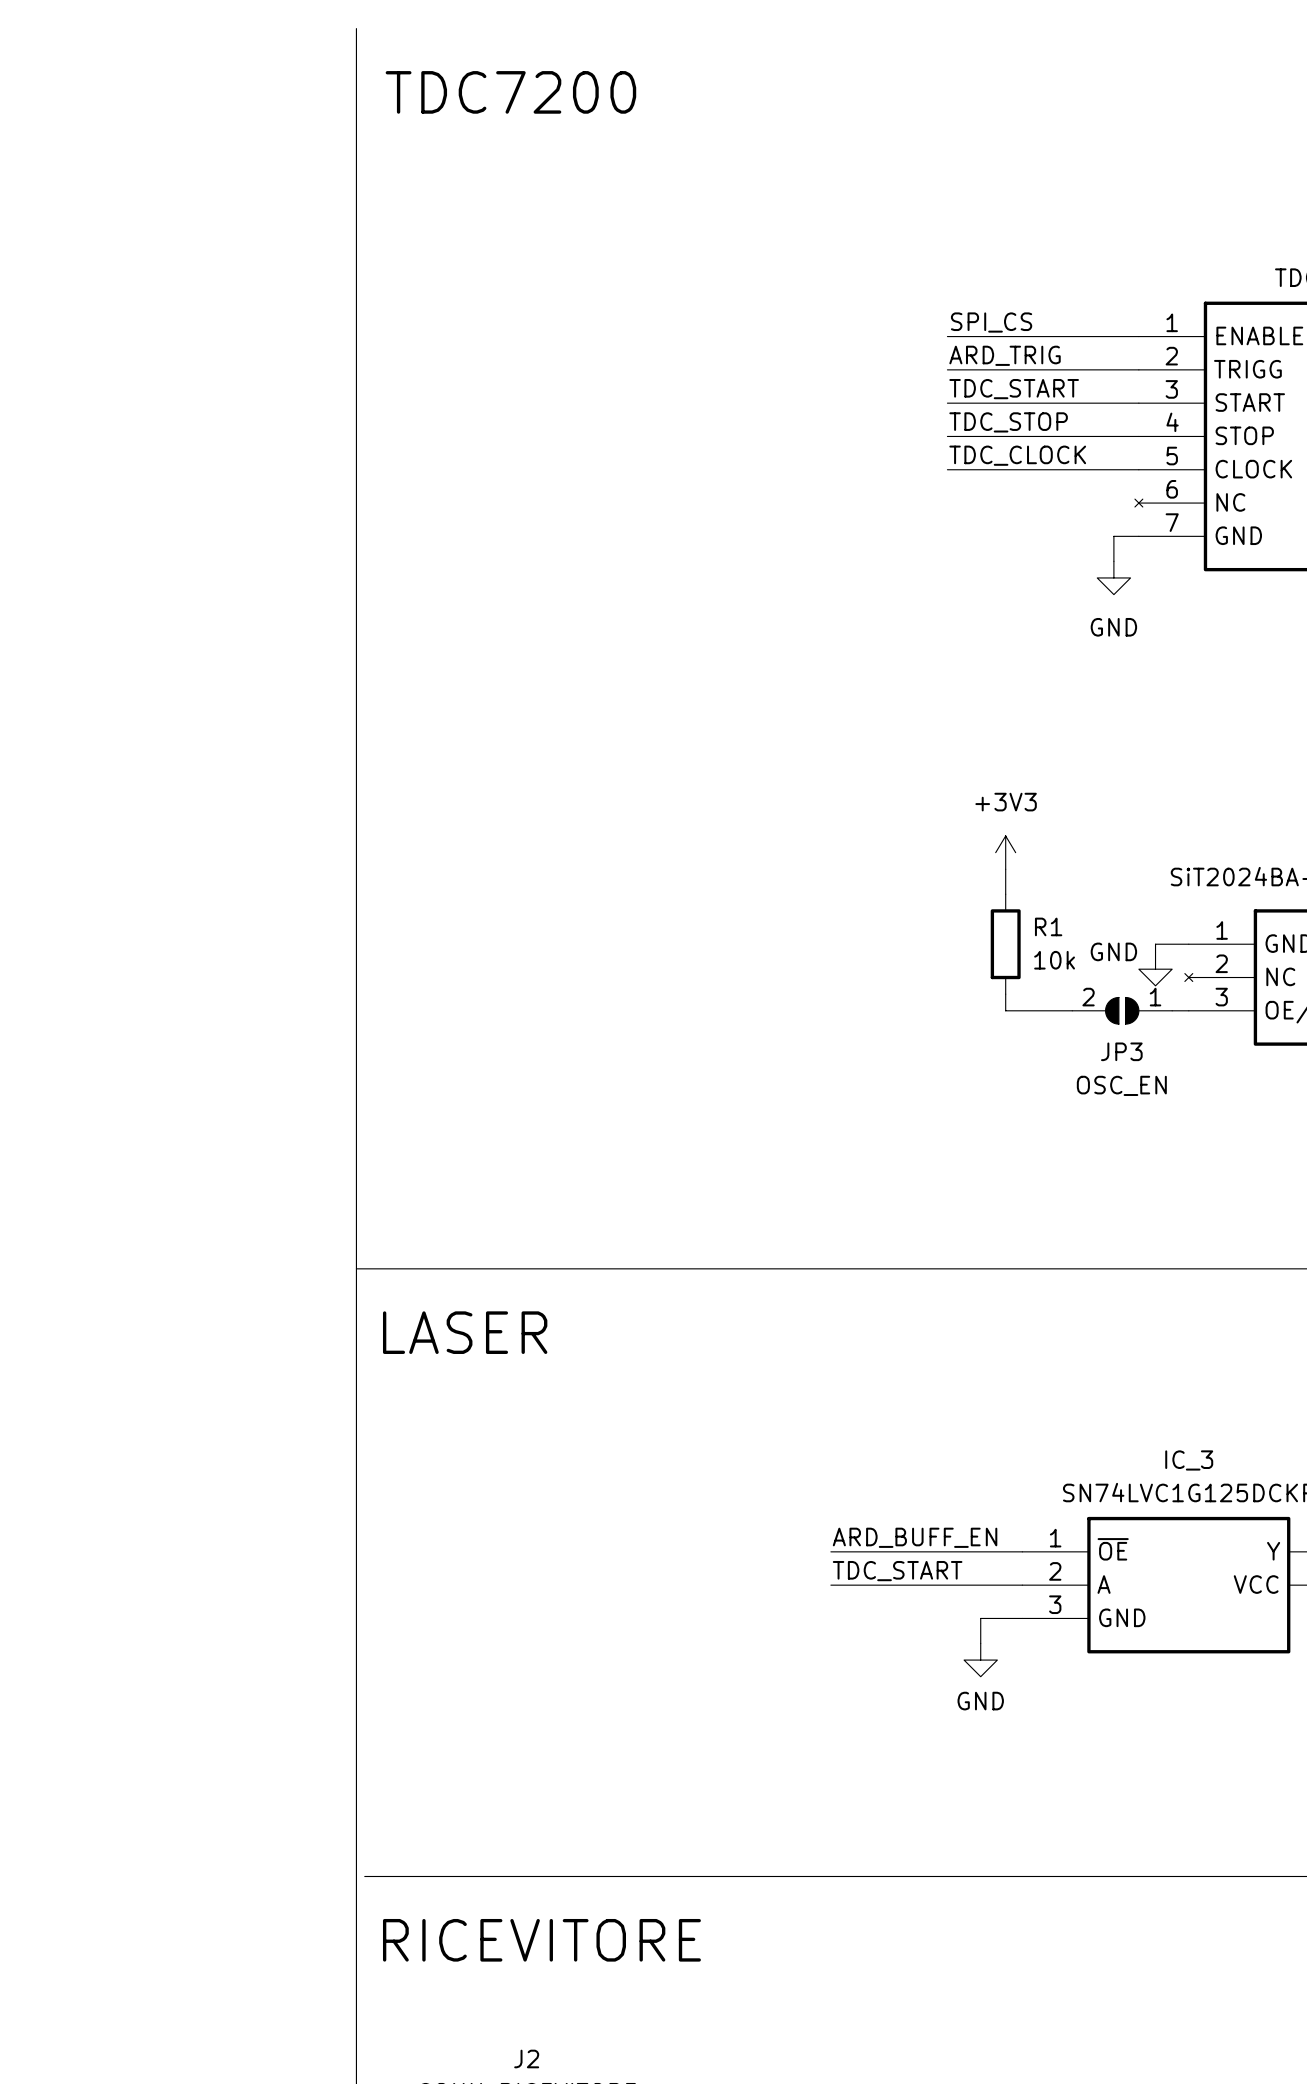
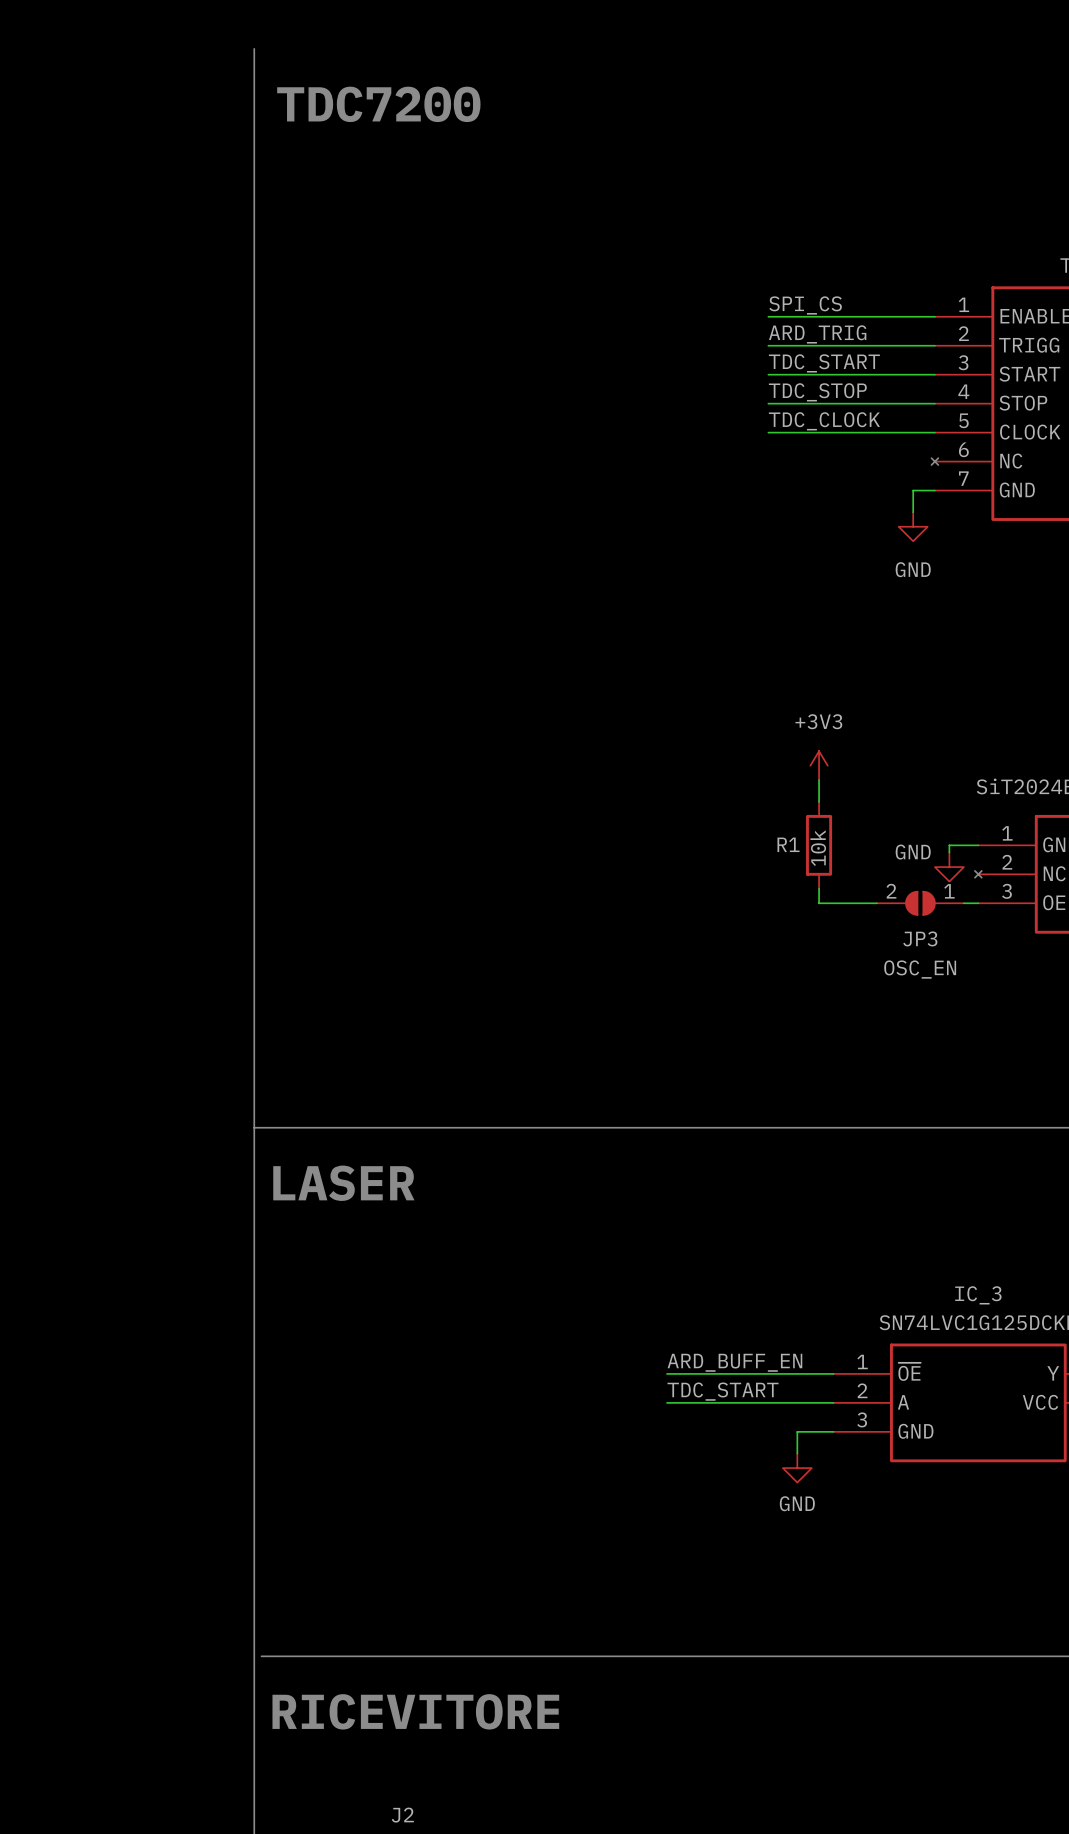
R1 name position: R1 (1048, 926) -> R1 (788, 844)
R1 value rotation: 0° (1054, 960) -> 90° counterclockwise (818, 848)
R1 value position: 10k (1054, 960) -> 10k (818, 848)

